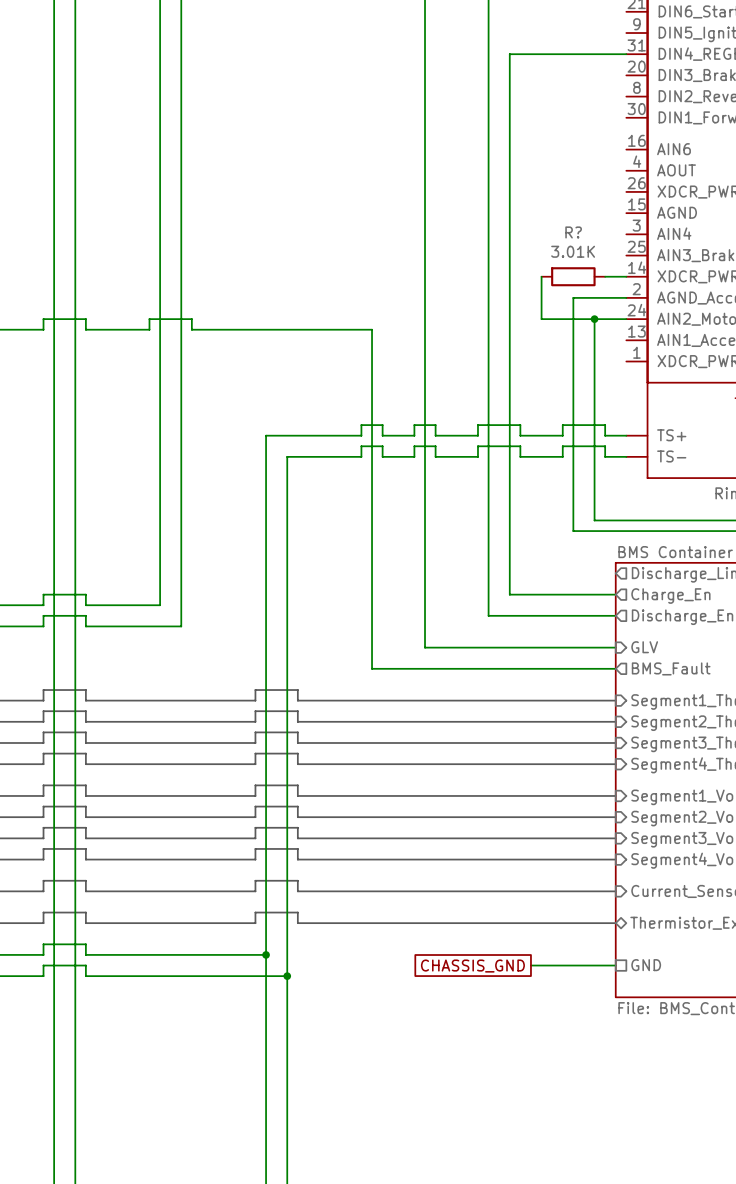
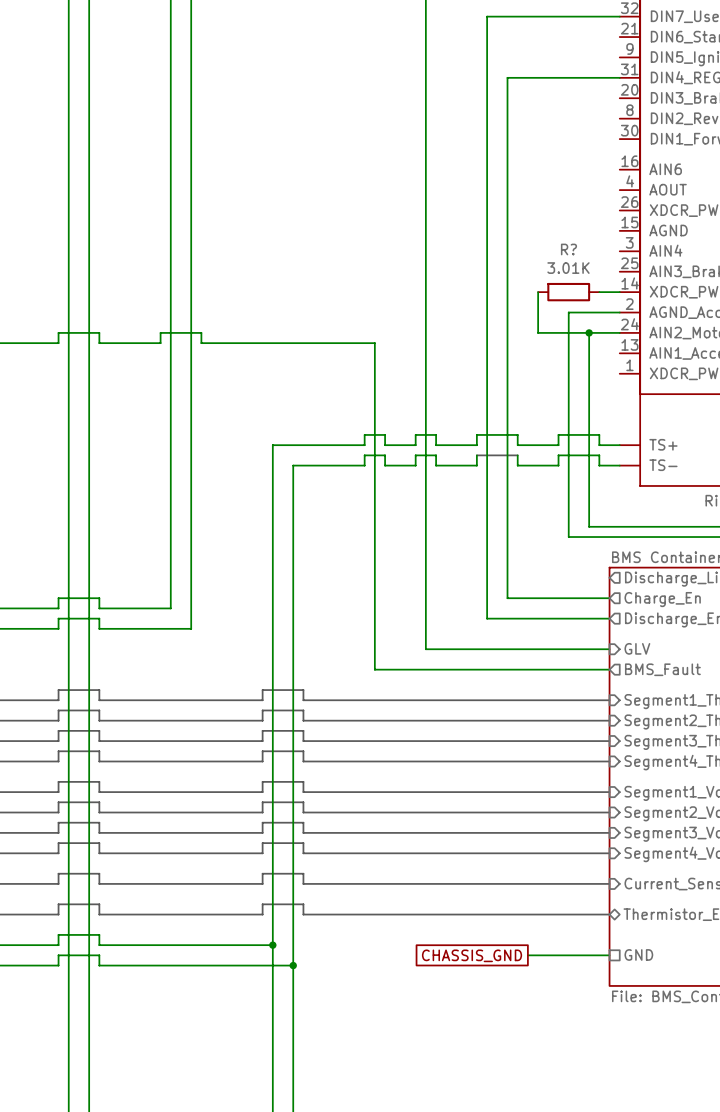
bus: none -> (476, 455) (517, 455)

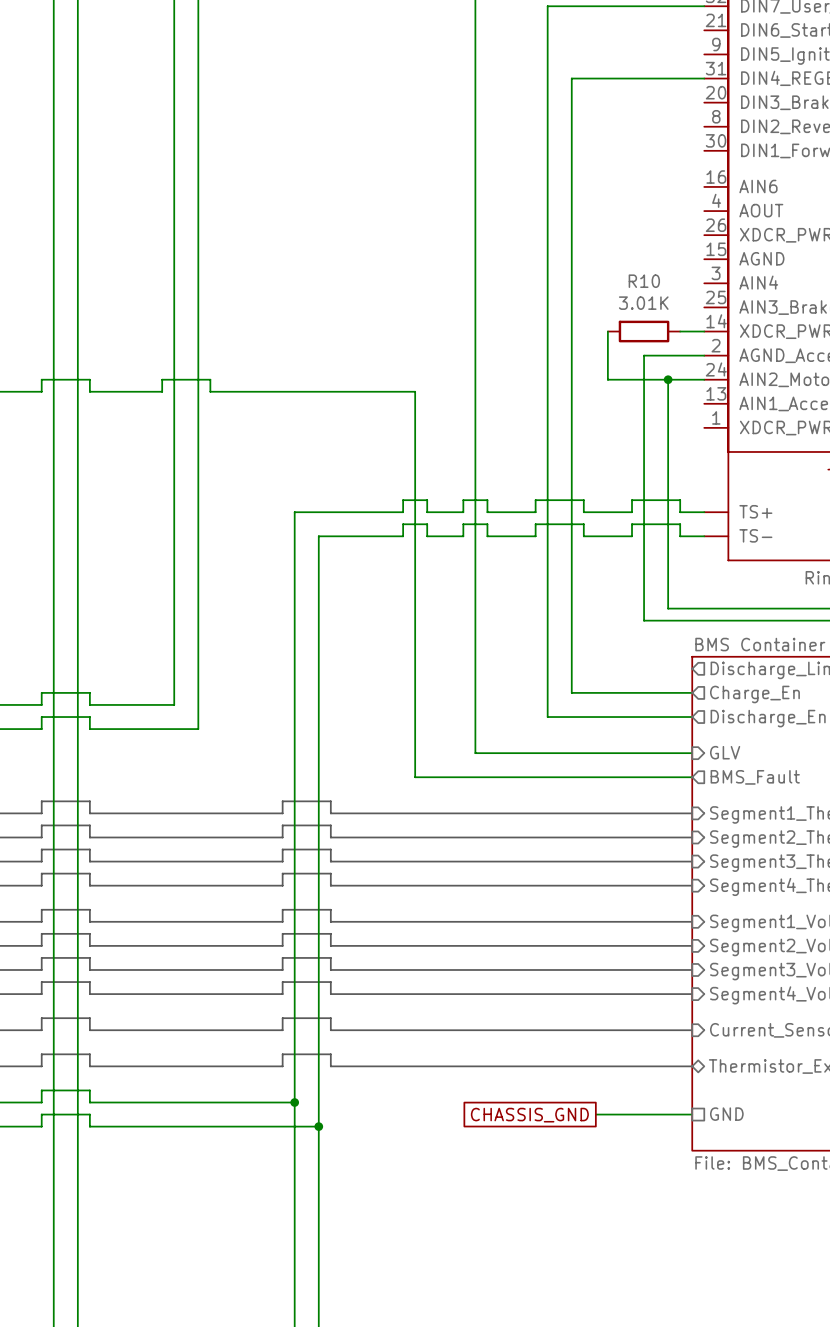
R? name: R? (568, 249) -> R10 (644, 281)
bus: (476, 455) (517, 455) -> none

